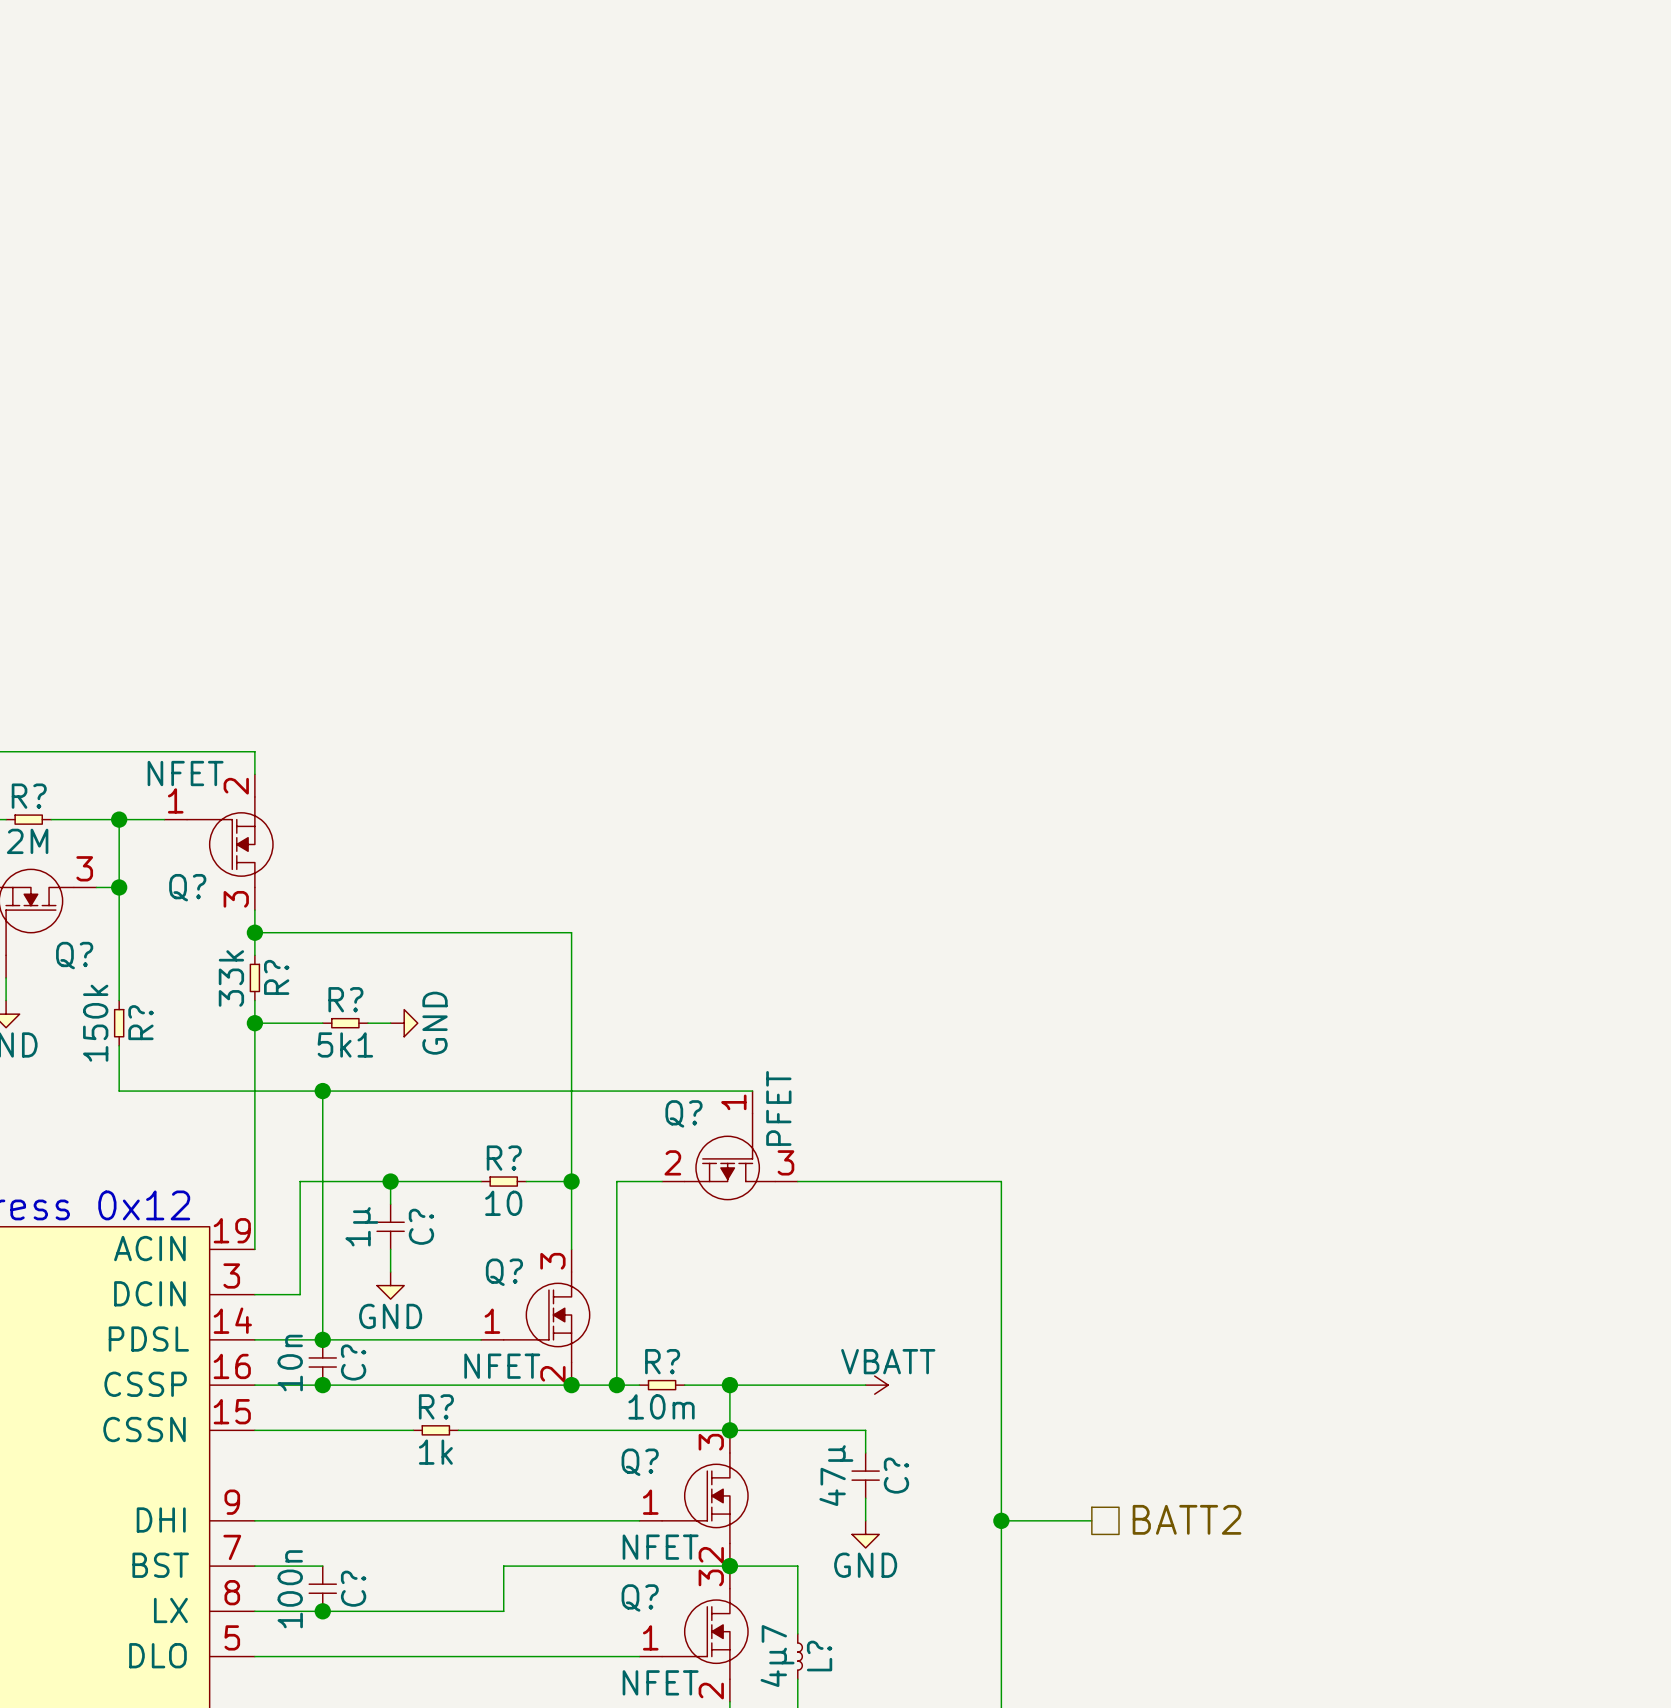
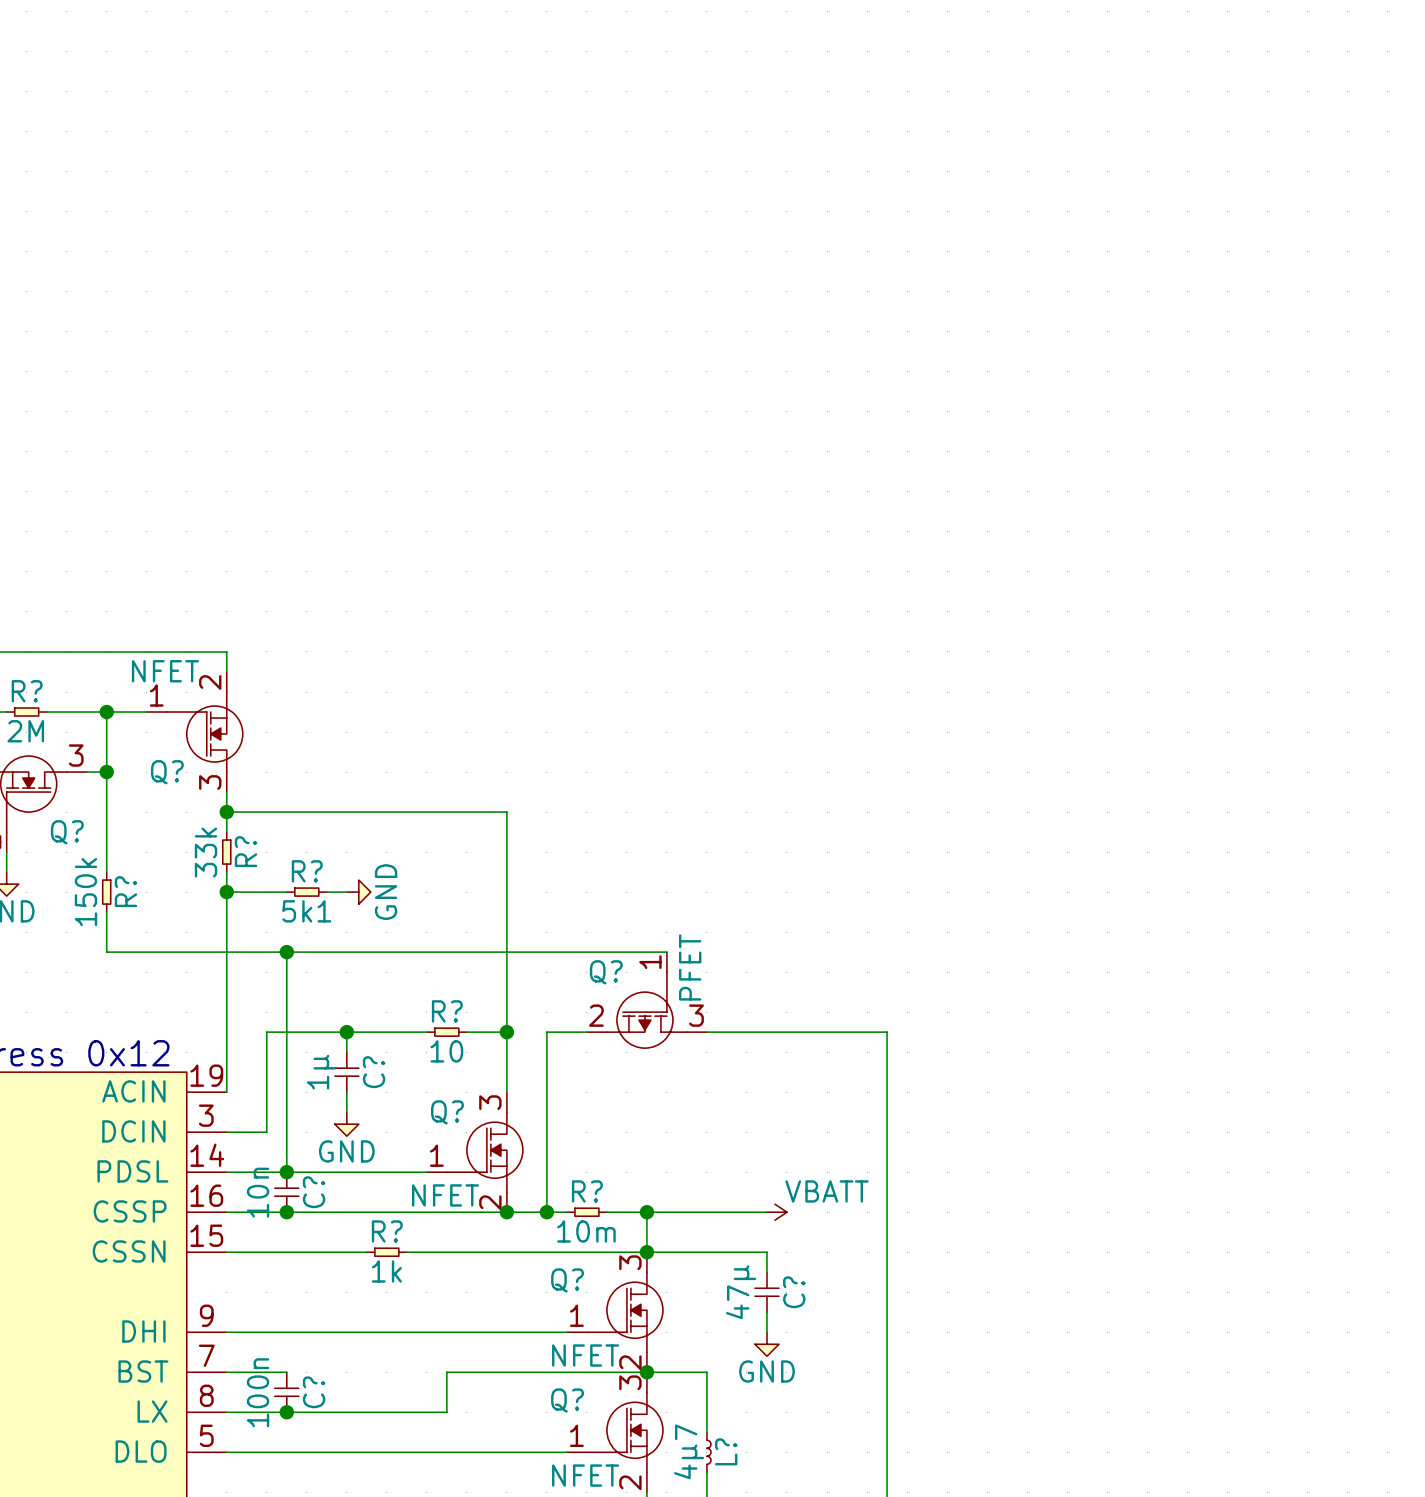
power symbol text position: VBATT (888, 1361) -> VBATT (827, 1191)
hierarchical label: BATT2 (1187, 1519) -> none
wire: (1001, 1520) (1091, 1520) -> none
junction: (1001, 1520) -> none

